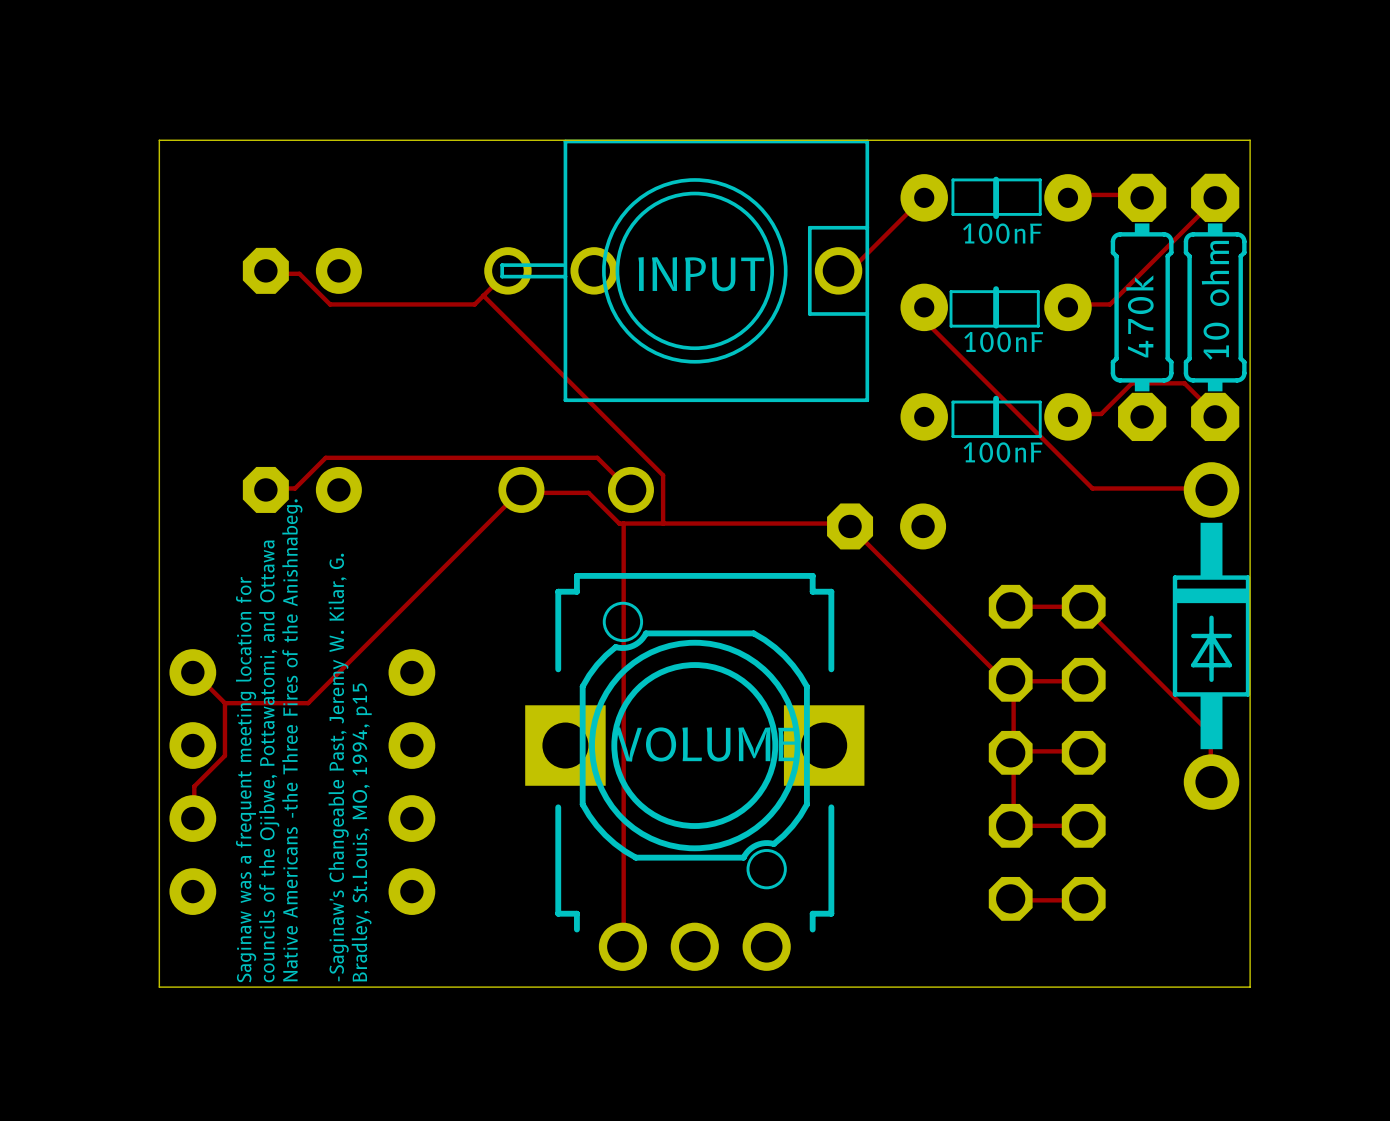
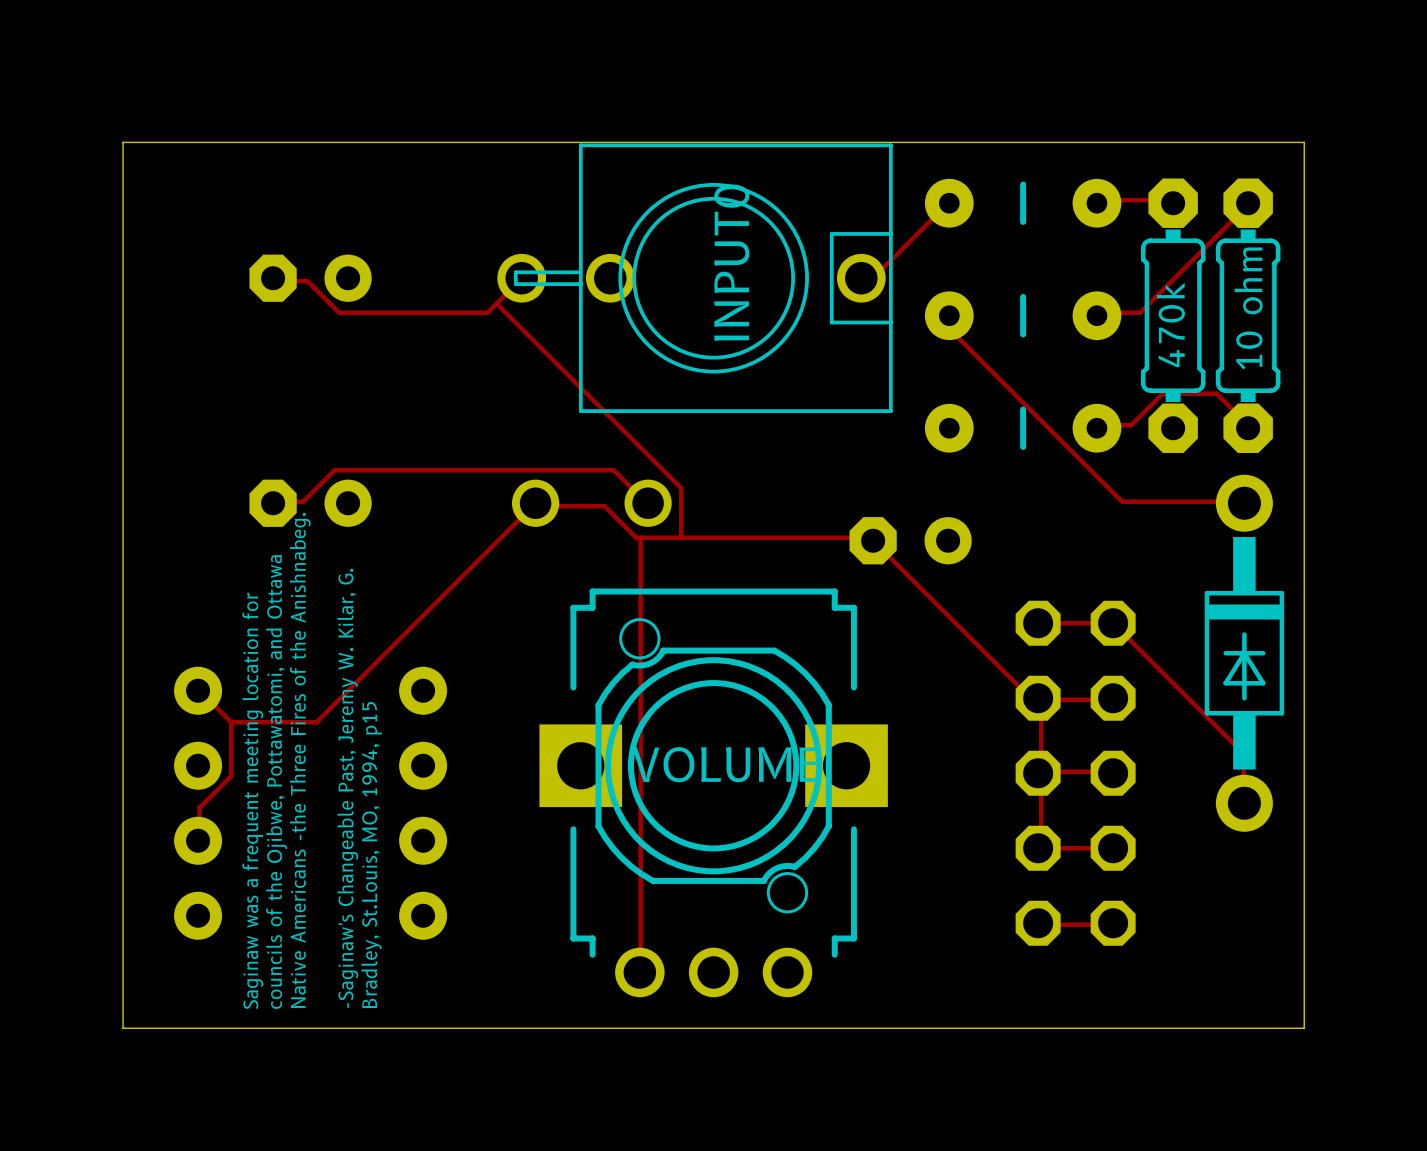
board edge: (159, 140) (1250, 140) (1250, 987) (159, 987) (159, 140) -> (123, 142) (123, 1028) (1304, 1028) (1304, 142) (123, 142)
line: (952, 179) (1040, 179) (1040, 214) (952, 214) (952, 179) -> none
part value: 100nF (1002, 233) -> none
INPUT name: INPUT (701, 274) -> INPUT0 (731, 262)
line: (951, 291) (1038, 291) (1038, 326) (951, 326) (951, 291) -> none
part value: 100nF (1003, 342) -> none
line: (952, 402) (952, 436) (1040, 436) (1040, 402) (952, 402) -> none
part value: 100nF (1003, 452) -> none

